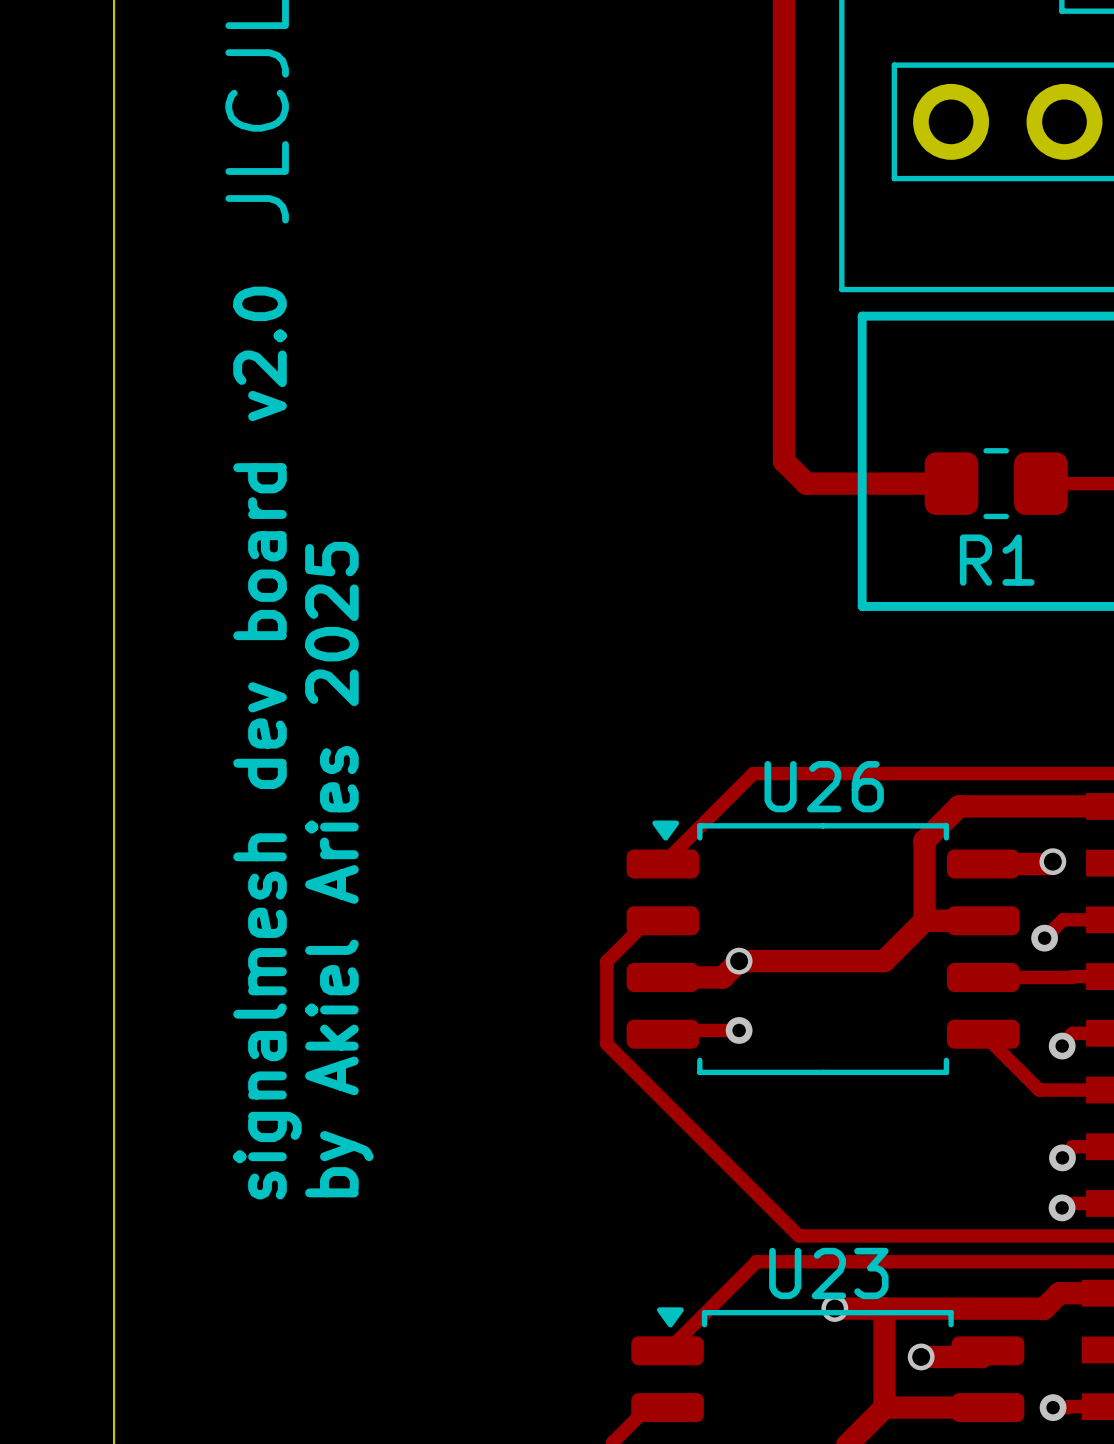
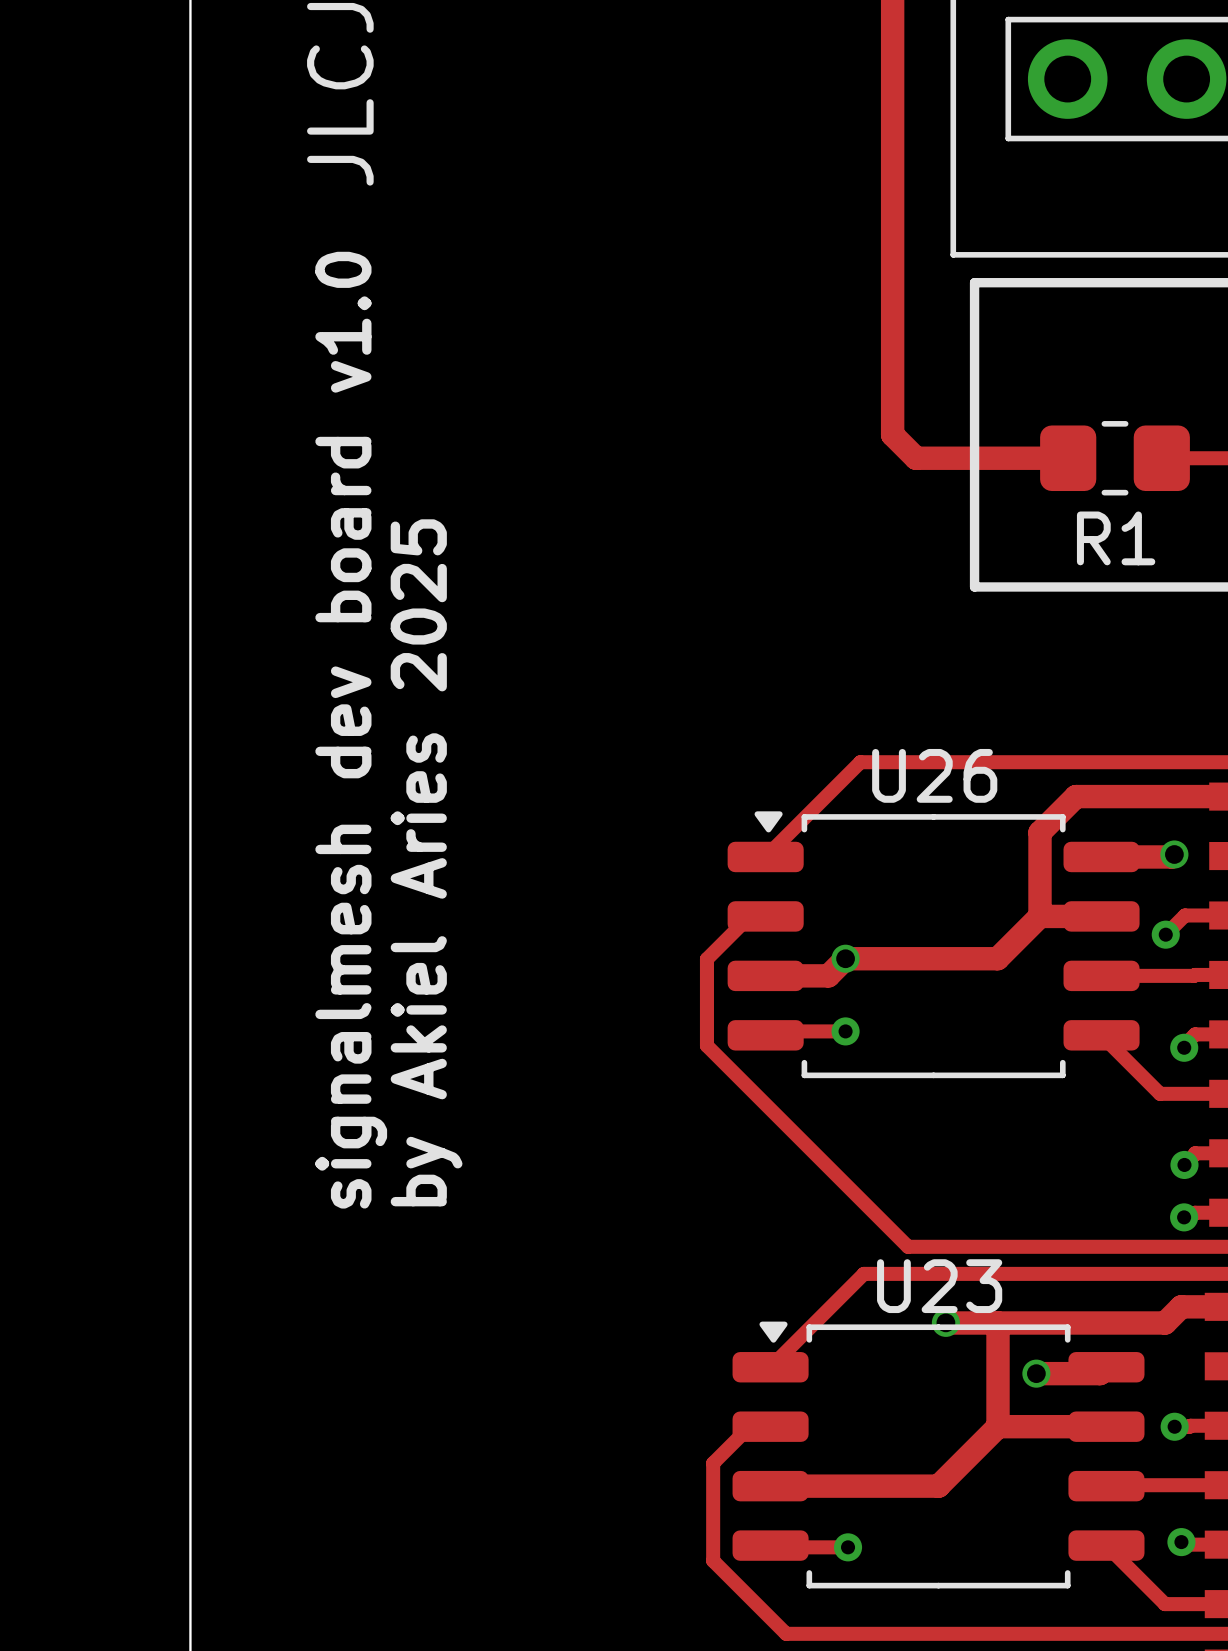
text: signalmesh dev board v2.0 (267, 743) -> signalmesh dev board v1.0 (351, 730)

